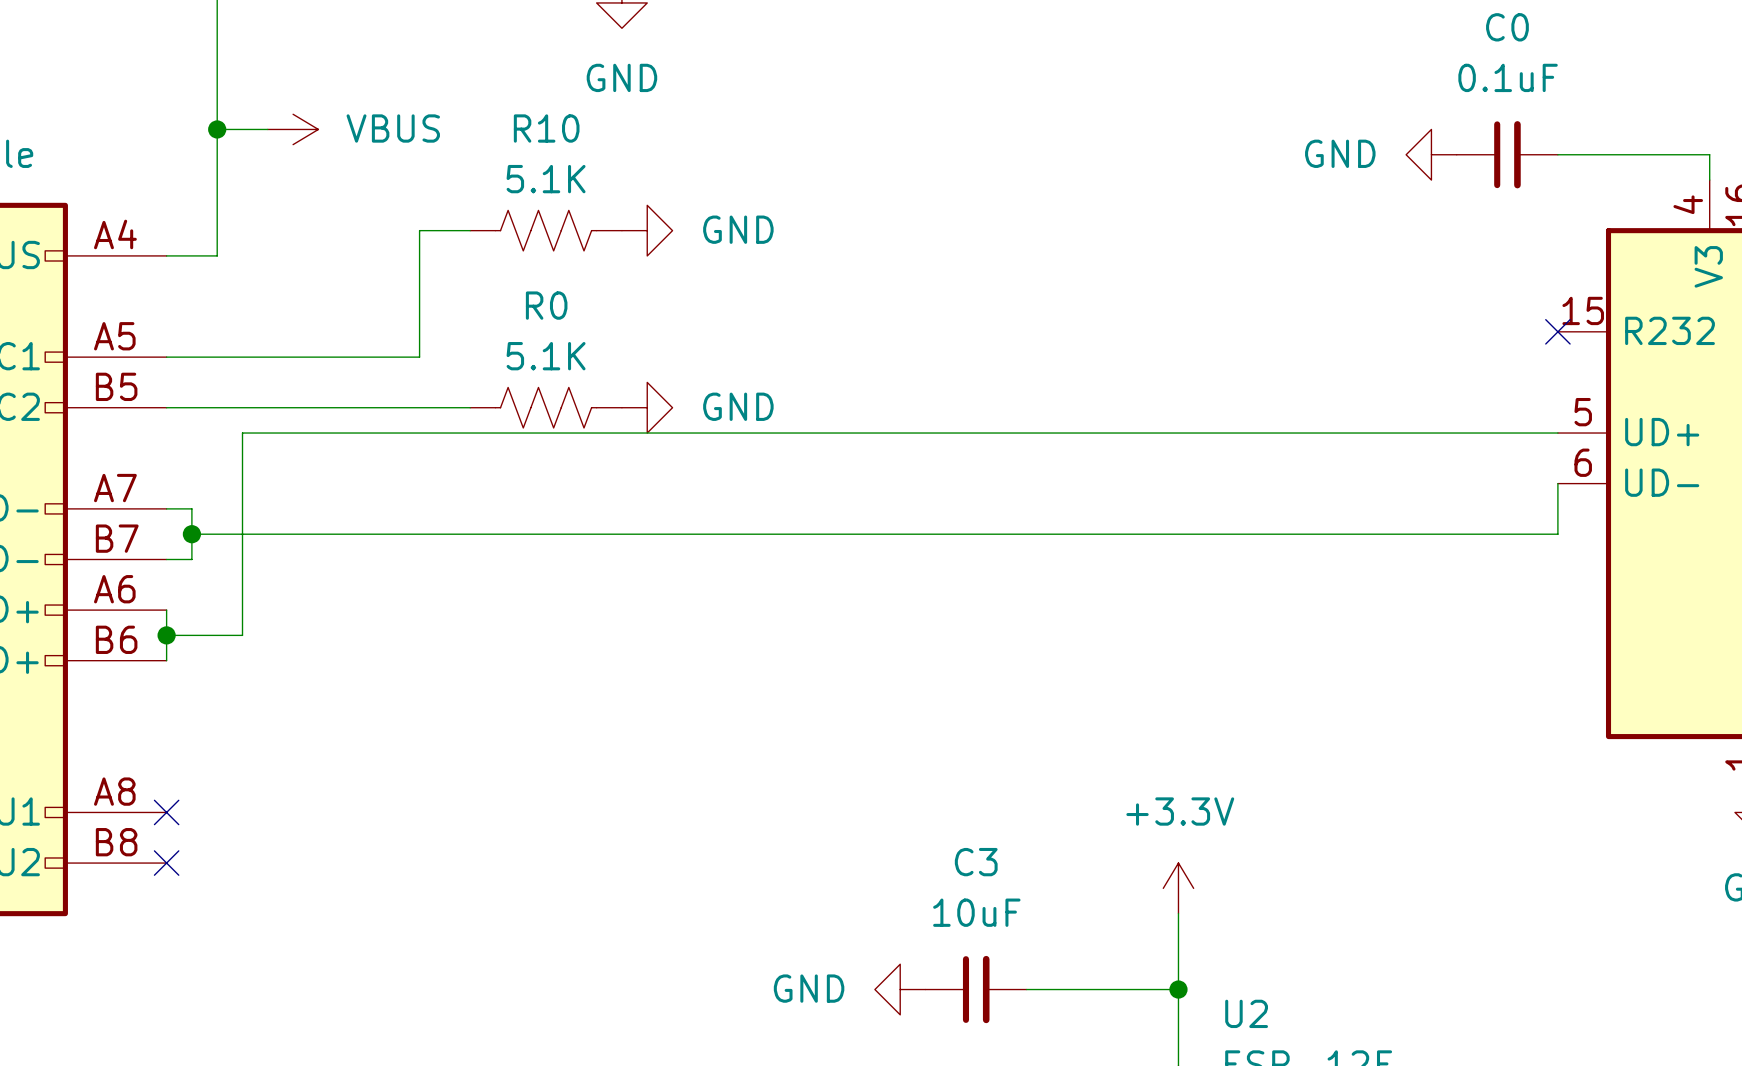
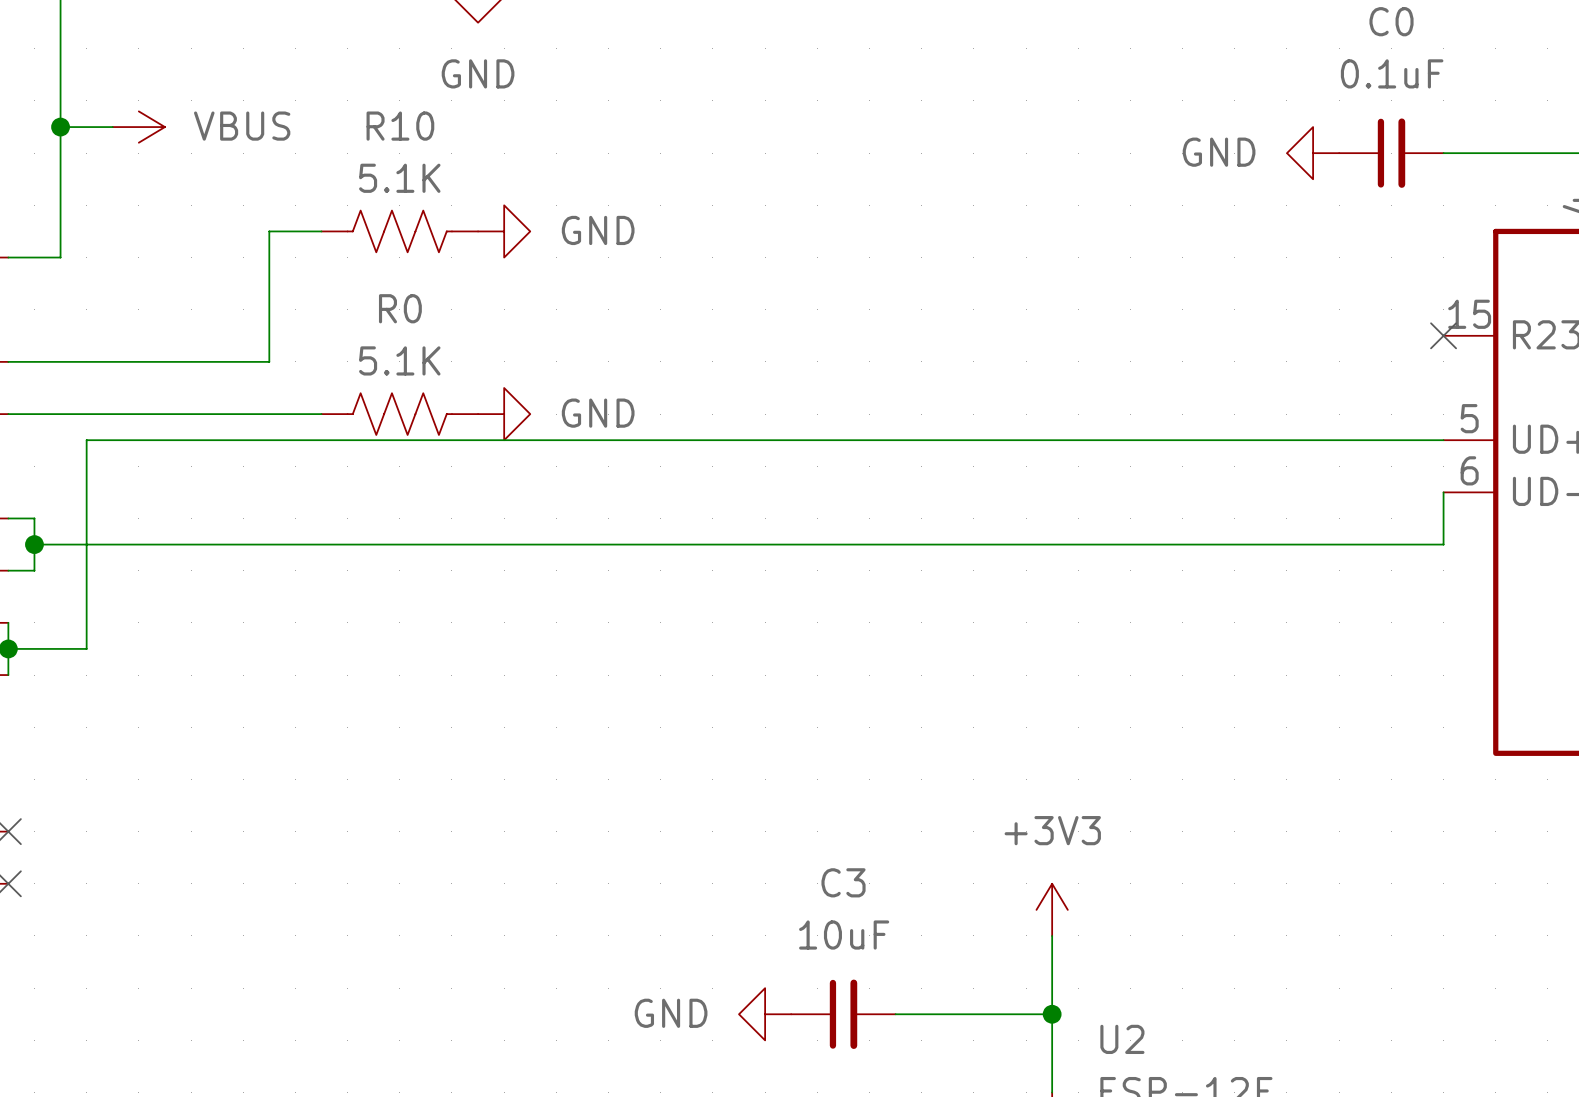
power symbol: +3.3V (1178, 888) -> +3V3 (1052, 909)

